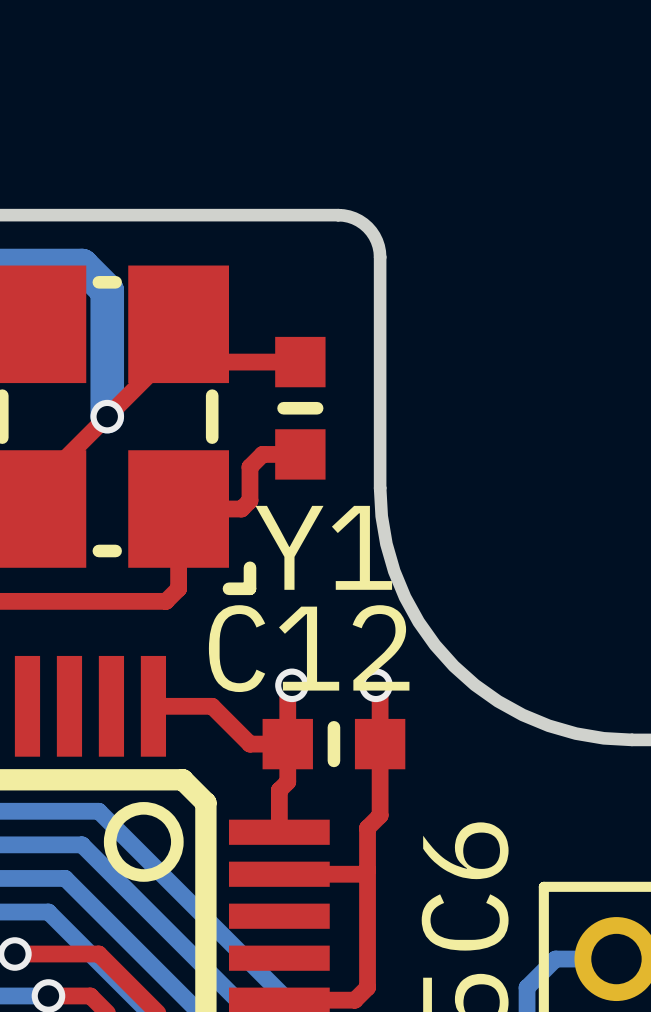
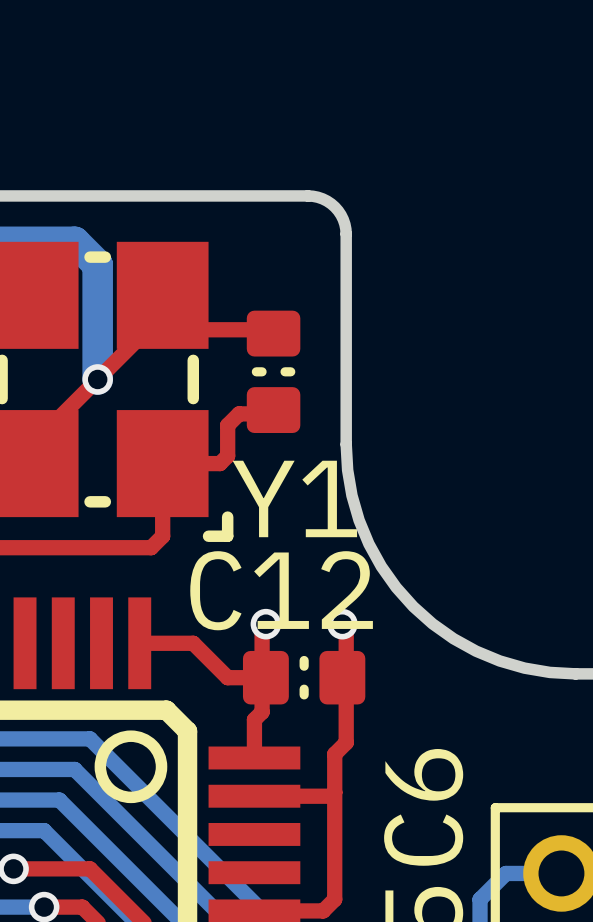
C12 footprint: [275, 336, 326, 480] -> [246, 310, 301, 434]
C6 footprint: [262, 718, 406, 770] -> [242, 650, 366, 705]

